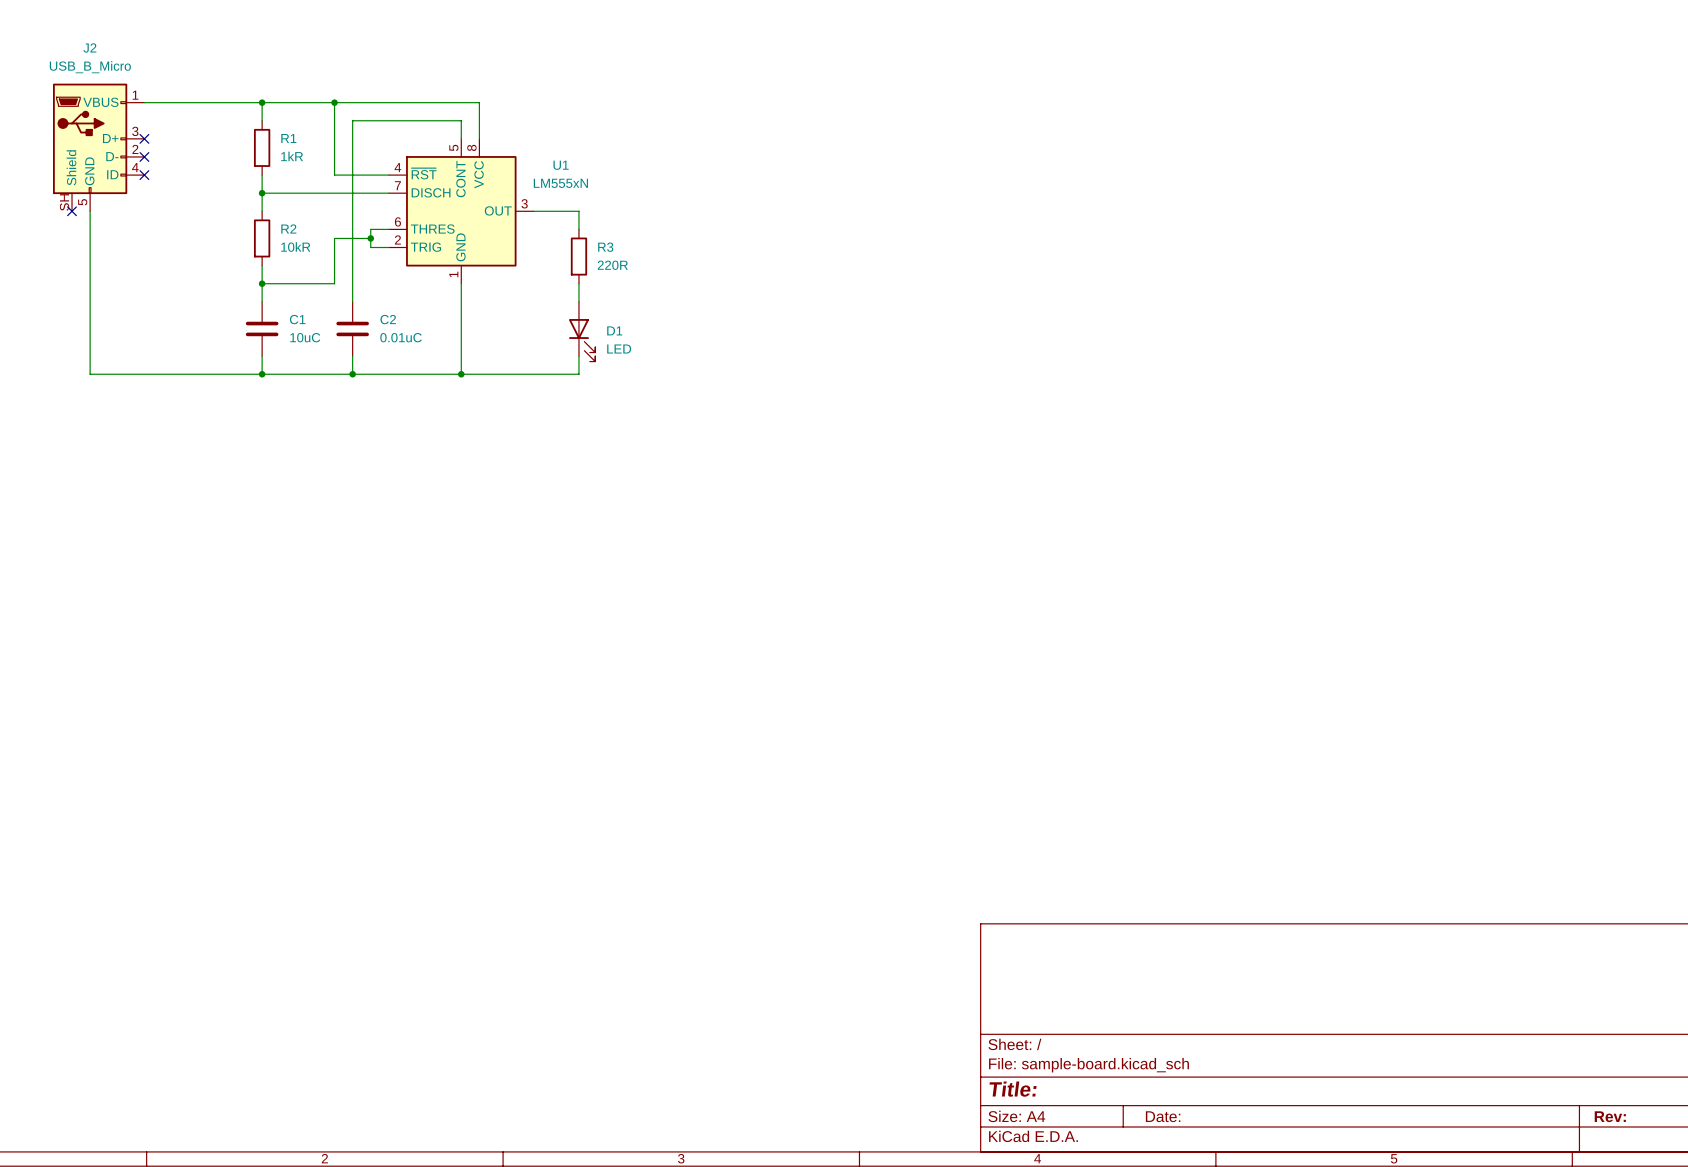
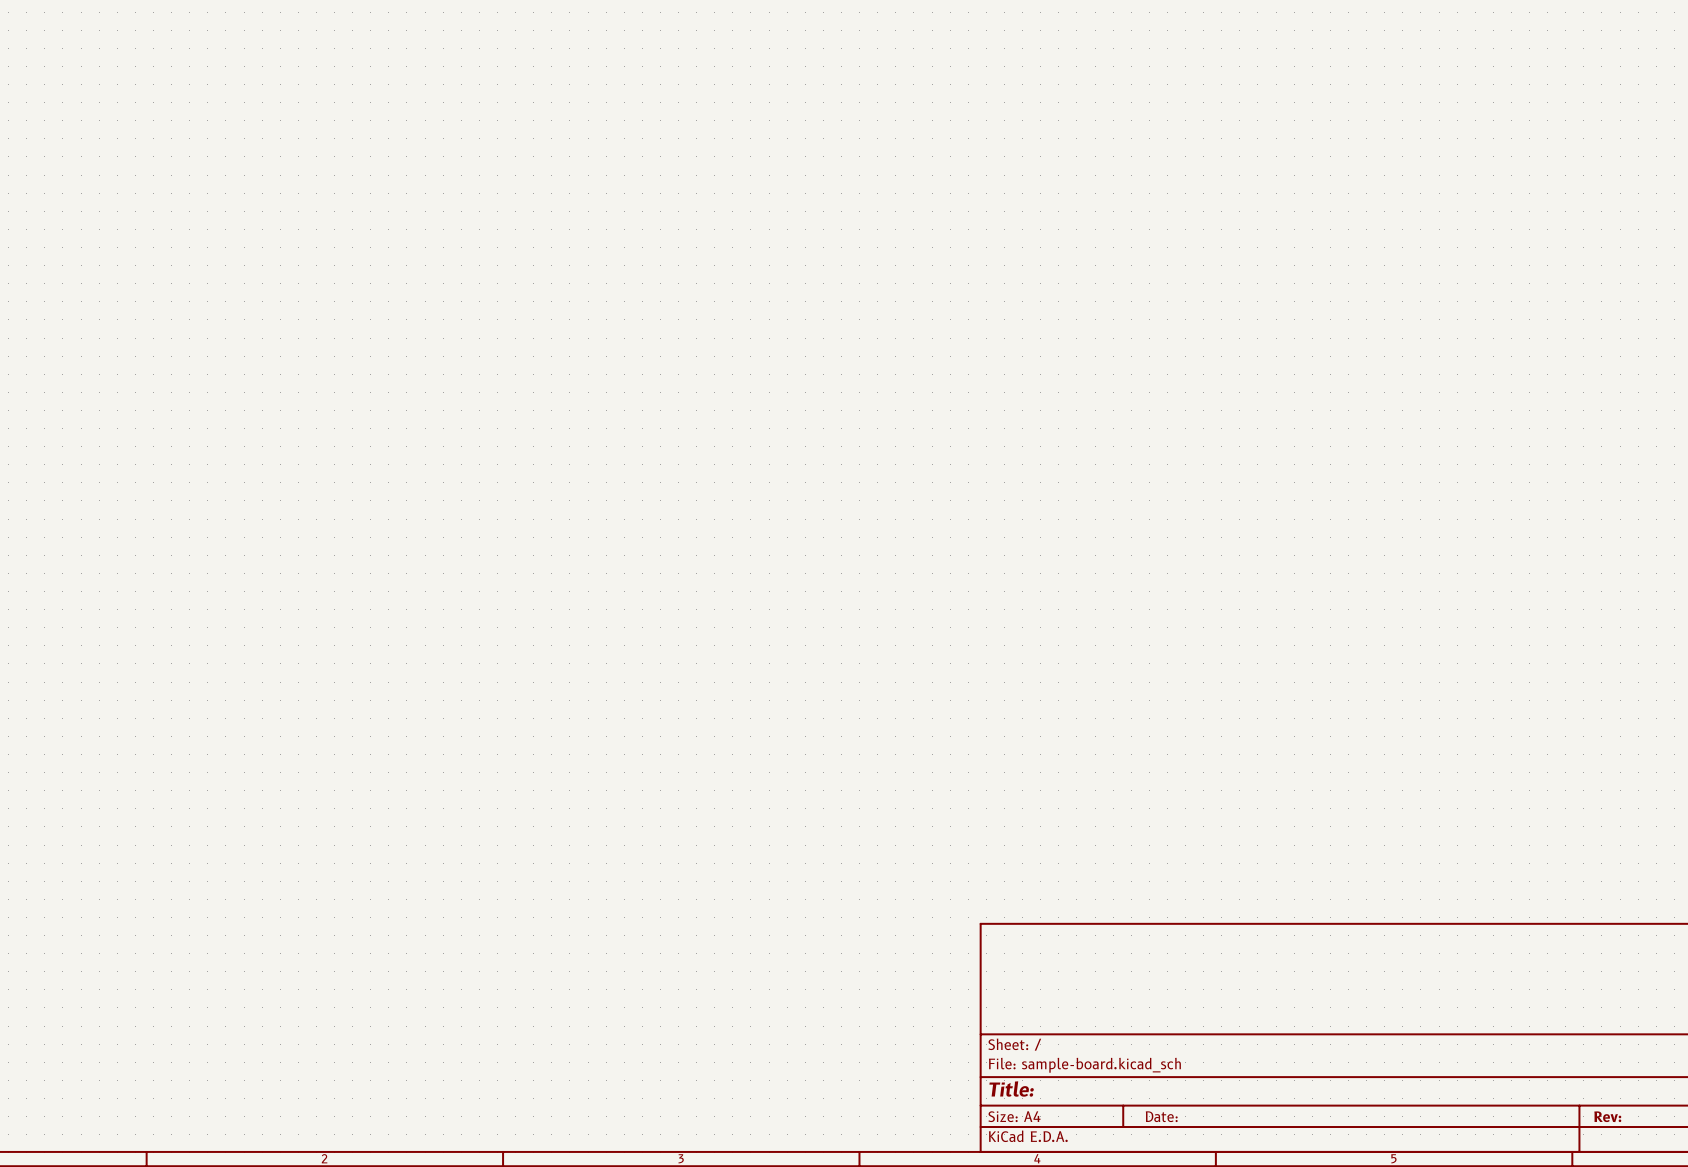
wire: (144, 102) (479, 102) (479, 138) -> none
wire: (262, 102) (262, 120) -> none
junction: (262, 102) -> none
wire: (334, 102) (334, 175) (388, 175) -> none
junction: (334, 102) -> none
no-connect mark: (144, 138) -> none
wire: (461, 138) (461, 120) (352, 120) (352, 301) -> none
J2: USB_B_Micro (98, 147) -> none
R1: 1kR (262, 147) -> none
no-connect mark: (144, 156) -> none
no-connect mark: (144, 175) -> none
wire: (262, 175) (262, 211) -> none
wire: (262, 193) (388, 193) -> none
junction: (262, 193) -> none
no-connect mark: (72, 211) -> none
wire: (90, 211) (90, 374) (578, 374) (578, 356) -> none
U1: LM555xN (461, 211) -> none
wire: (533, 211) (578, 211) (578, 229) -> none
wire: (388, 229) (370, 229) (370, 247) (388, 247) -> none
R2: 10kR (262, 238) -> none
wire: (370, 238) (334, 238) (334, 283) (262, 283) -> none
junction: (370, 238) -> none
R3: 220R (578, 256) -> none
wire: (262, 265) (262, 301) -> none
junction: (262, 283) -> none
wire: (461, 283) (461, 374) -> none
wire: (578, 283) (578, 301) -> none
C1: 10uC (262, 328) -> none
C2: 0.01uC (352, 328) -> none
D1: LED (582, 331) -> none
wire: (262, 356) (262, 374) -> none
wire: (352, 356) (352, 374) -> none
junction: (262, 374) -> none
junction: (352, 374) -> none
junction: (461, 374) -> none

